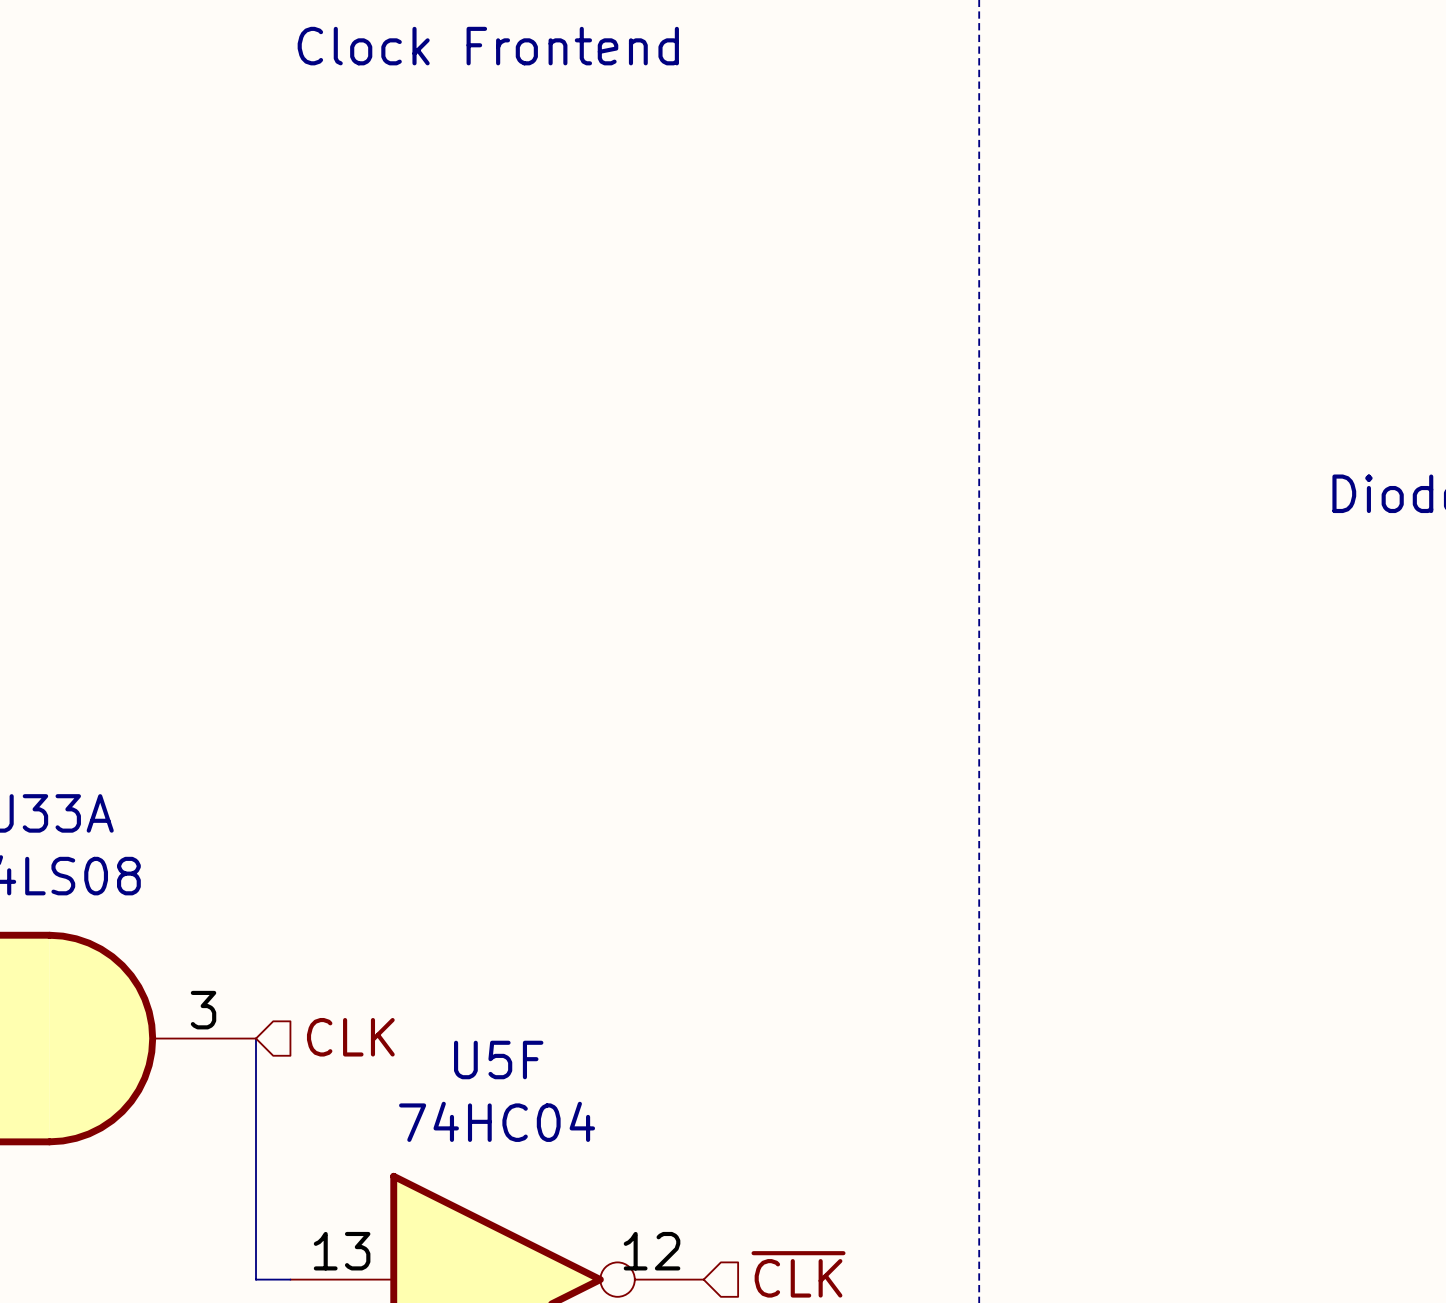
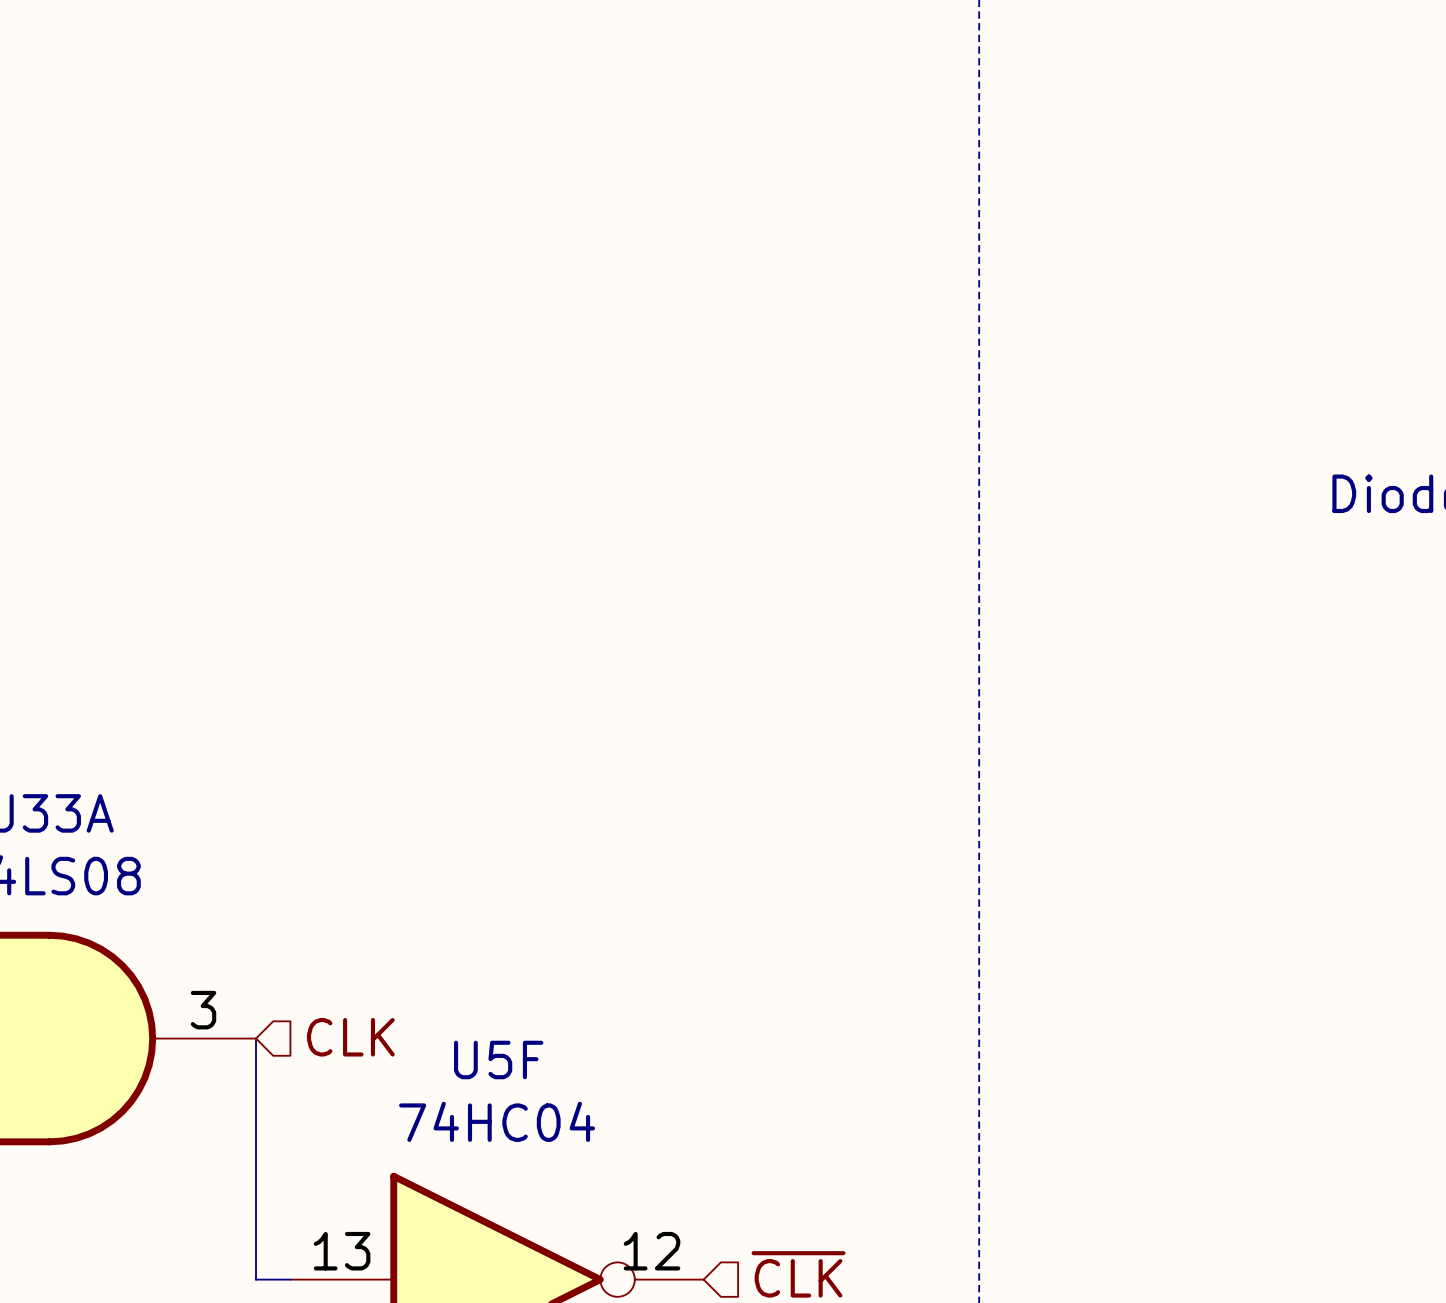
text: Clock Frontend (488, 46) -> none

